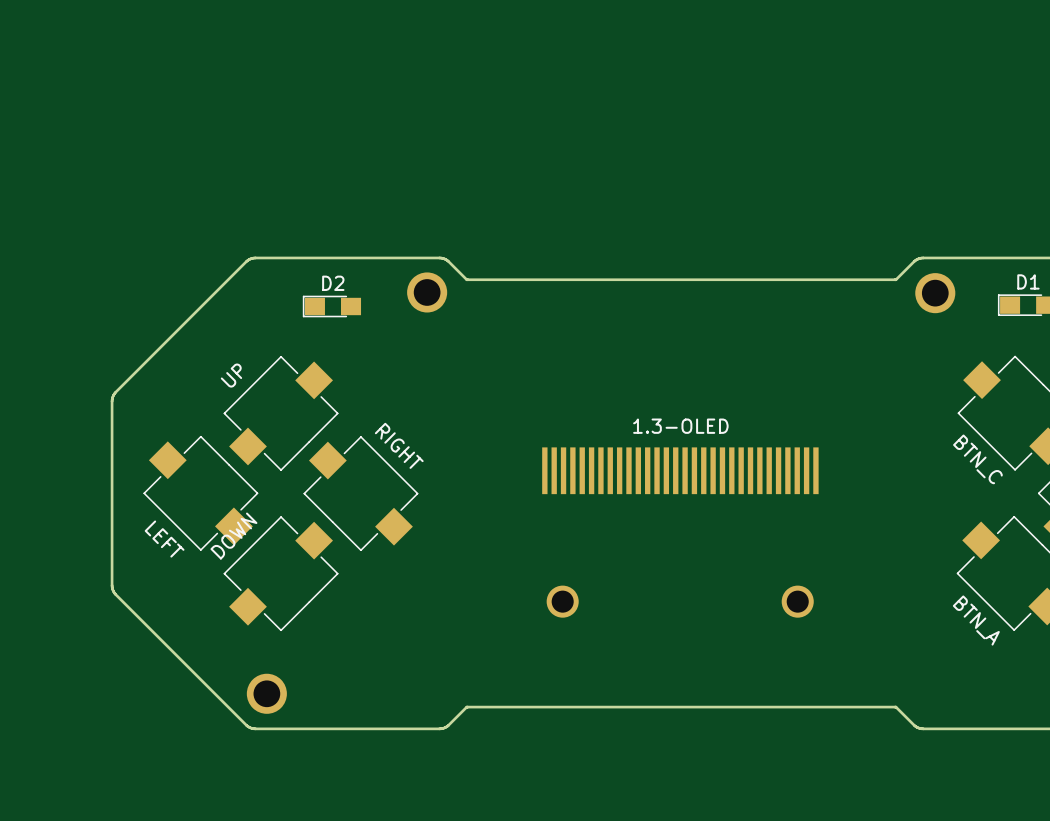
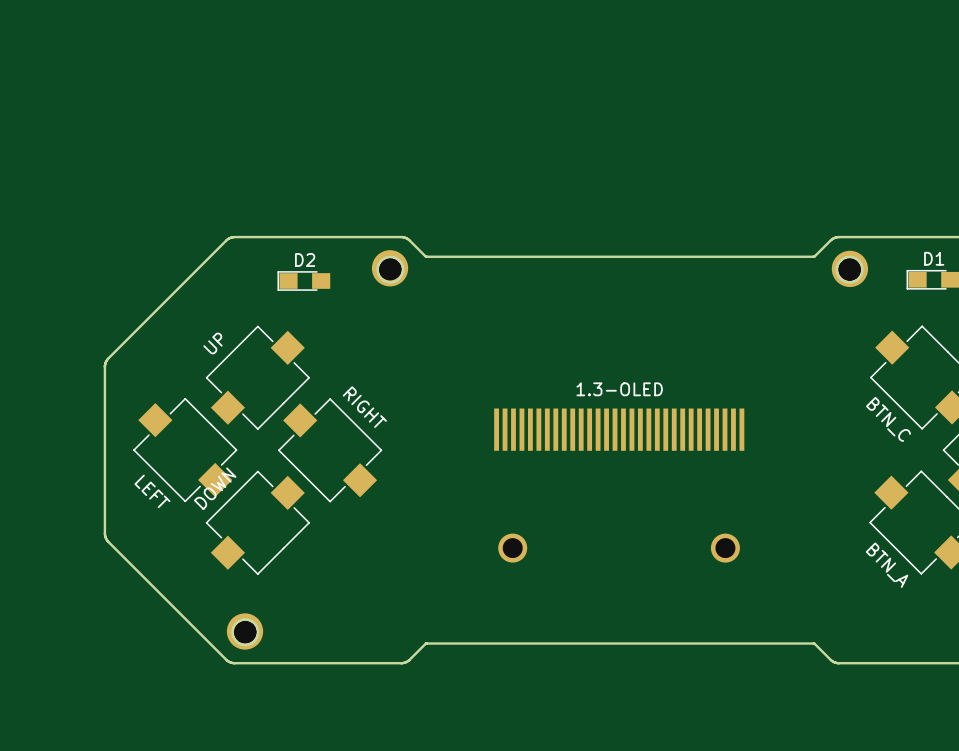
board edge: none -> (389, 257) (398, 260) (402, 267) (400, 277) (391, 282) (381, 279) (377, 272) (380, 262) (389, 257)
board edge: none -> (848, 257) (858, 260) (862, 267) (859, 277) (850, 282) (841, 279) (837, 272) (839, 262) (848, 257)
board edge: none -> (244, 619) (253, 622) (257, 629) (255, 639) (246, 644) (236, 641) (232, 634) (235, 624) (244, 619)

